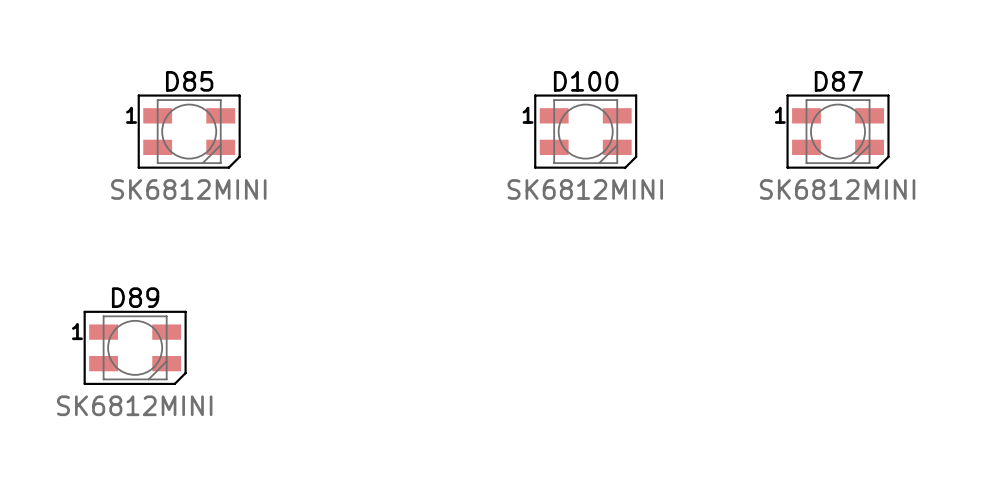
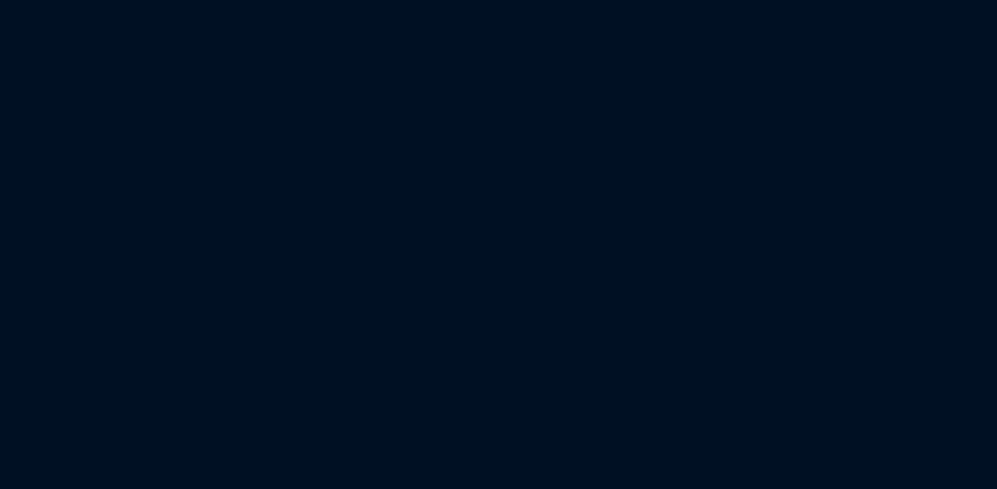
D85: SK6812MINI (189, 131) -> none
D100: SK6812MINI (585, 131) -> none
D87: SK6812MINI (838, 131) -> none
D89: SK6812MINI (135, 347) -> none

